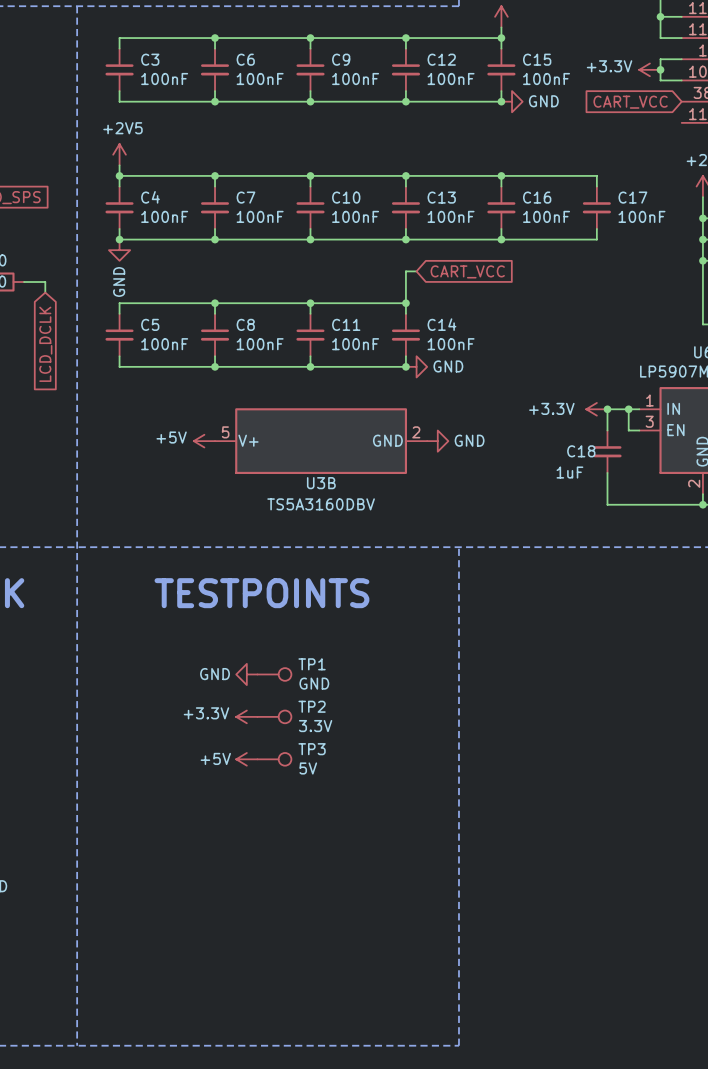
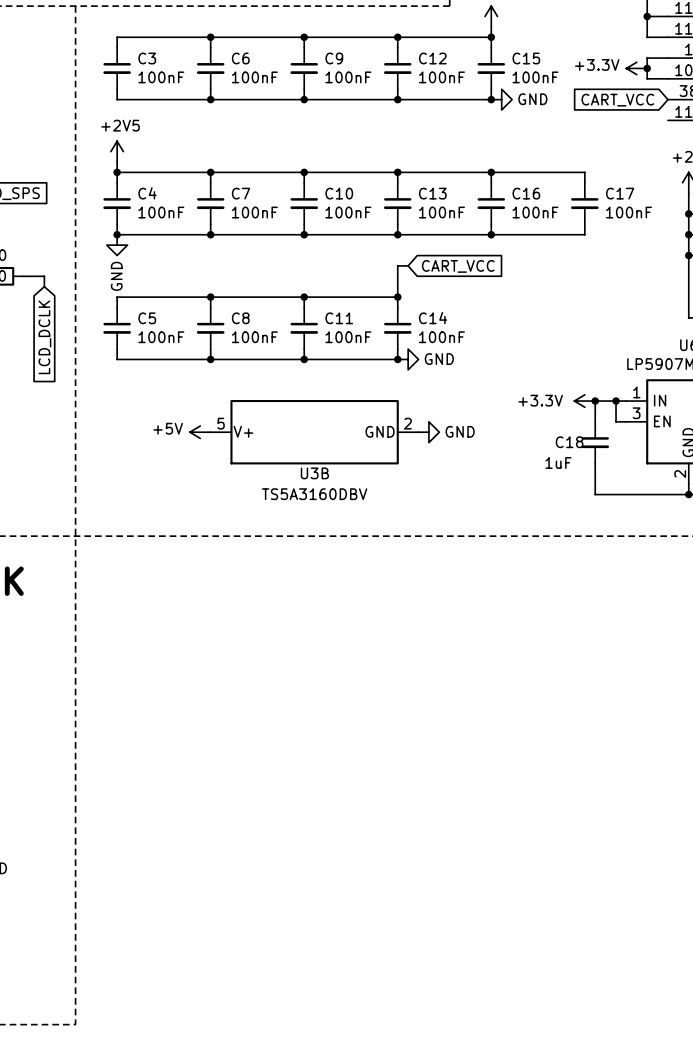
line: (458, 547) (458, 1045) (77, 1045) -> none
text: TESTPOINTS (261, 593) -> none
power symbol: GND (246, 674) -> none
TP1: GND (274, 674) -> none
power symbol: +3.3V (246, 716) -> none
TP2: 3.3V (274, 716) -> none
power symbol: +5V (246, 759) -> none
TP3: 5V (274, 759) -> none

